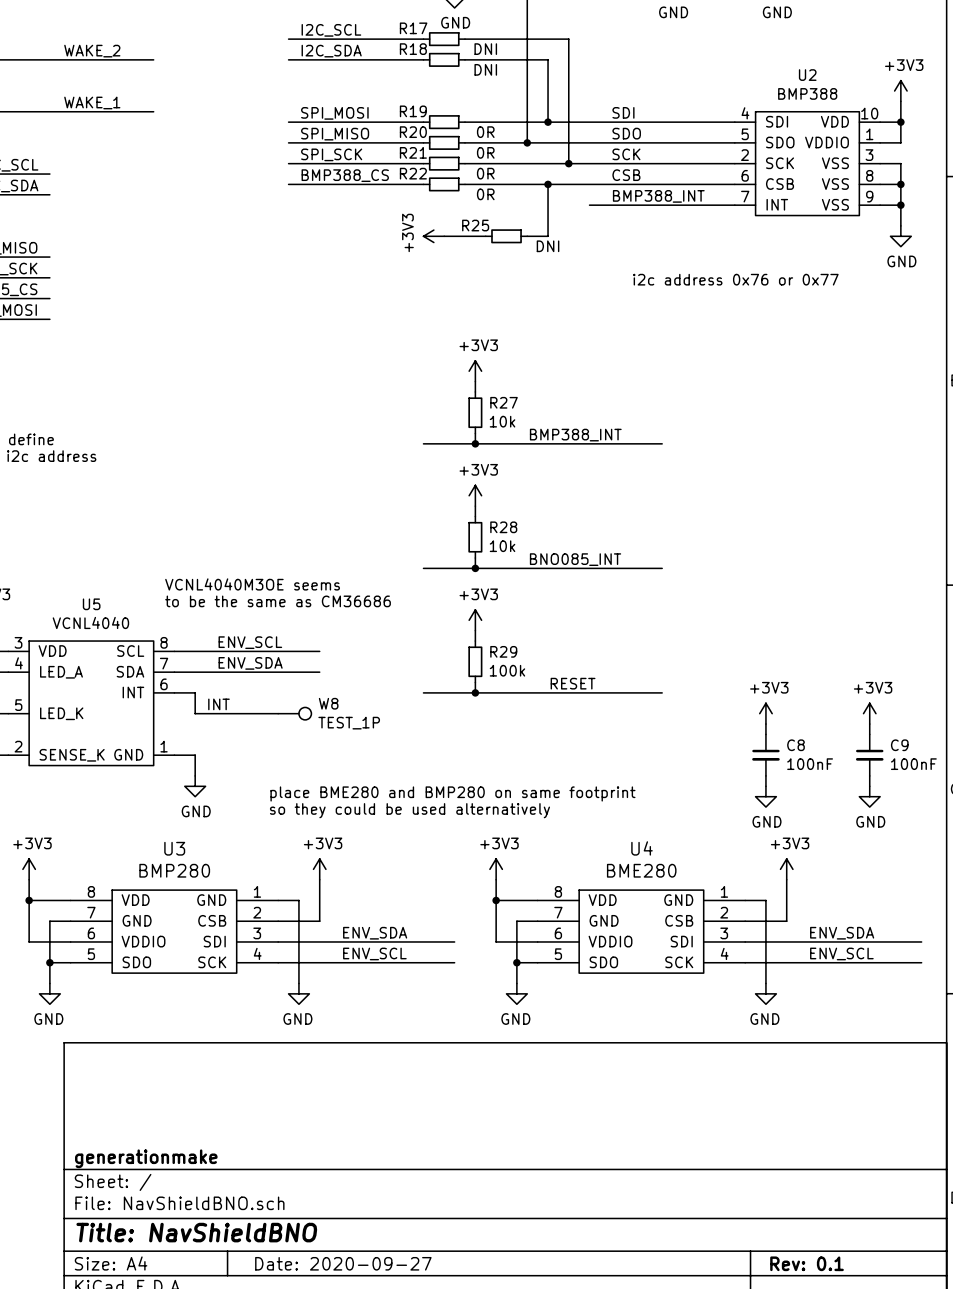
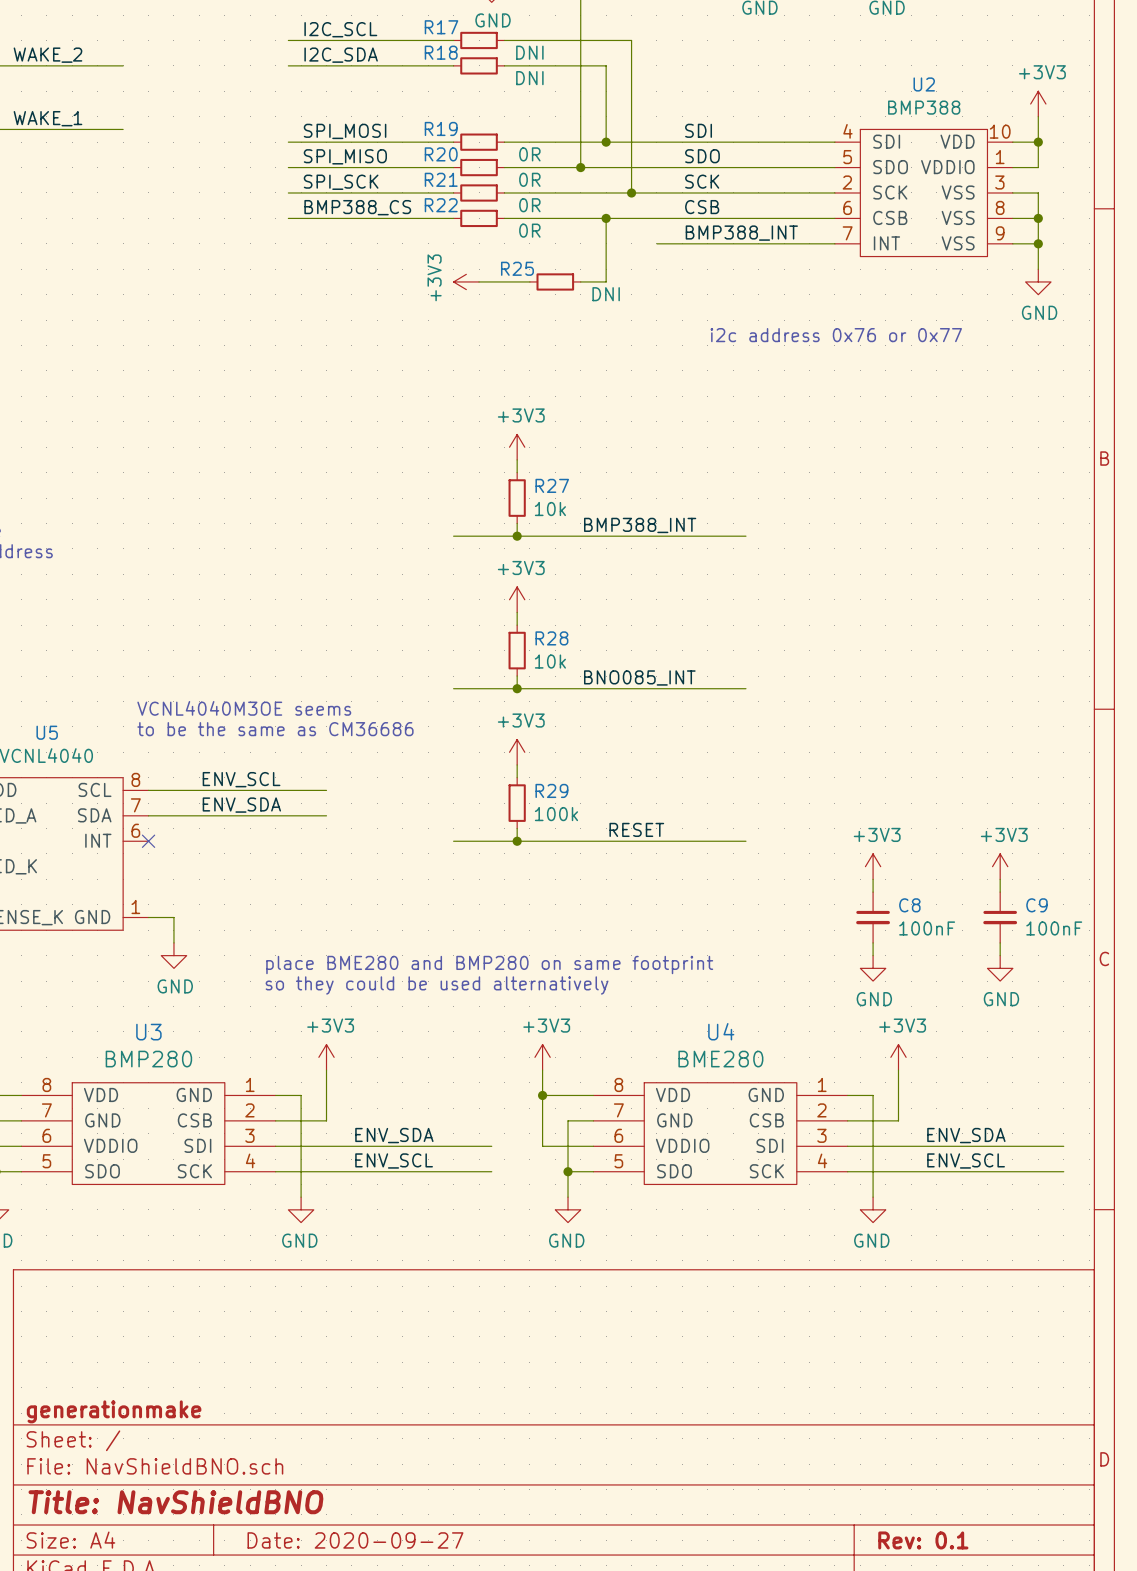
wire: (174, 692) (195, 692) (195, 713) (278, 713) -> none
no-connect mark: none -> (148, 841)
label: INT (218, 704) -> none
W8: TEST_1P (294, 713) -> none

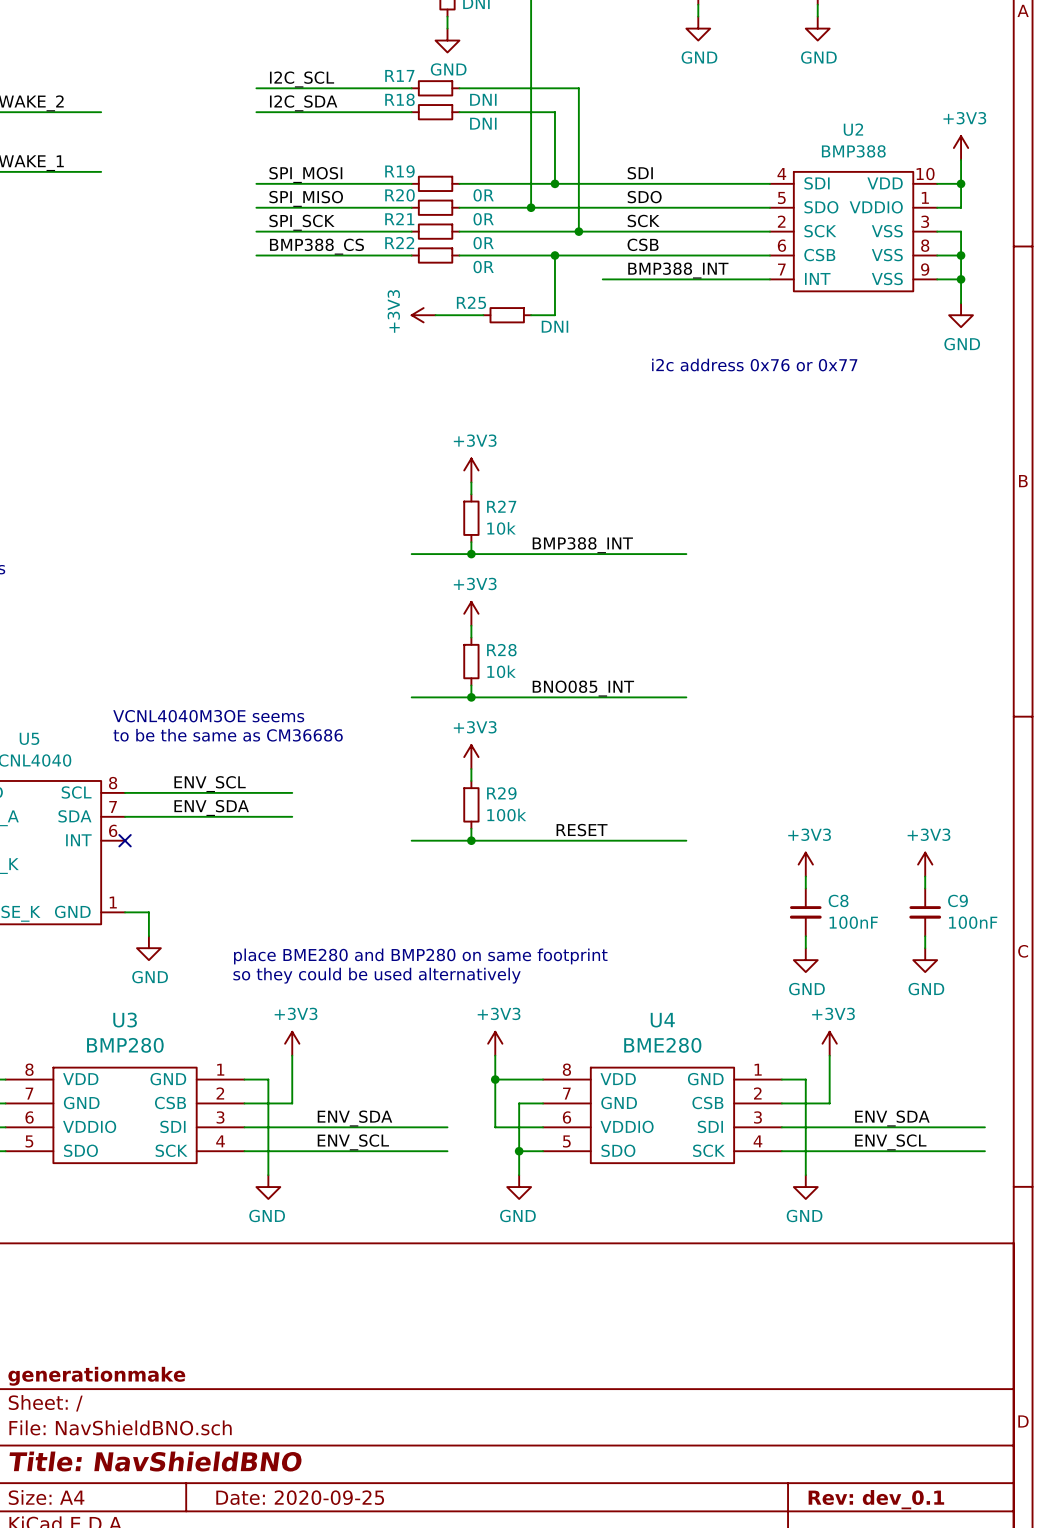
title block: Date: 2020-09-27 (355, 1540) -> Date: 2020-09-25 (300, 1497)
title block: Rev: 0.1 (923, 1540) -> Rev: dev_0.1 (876, 1499)

